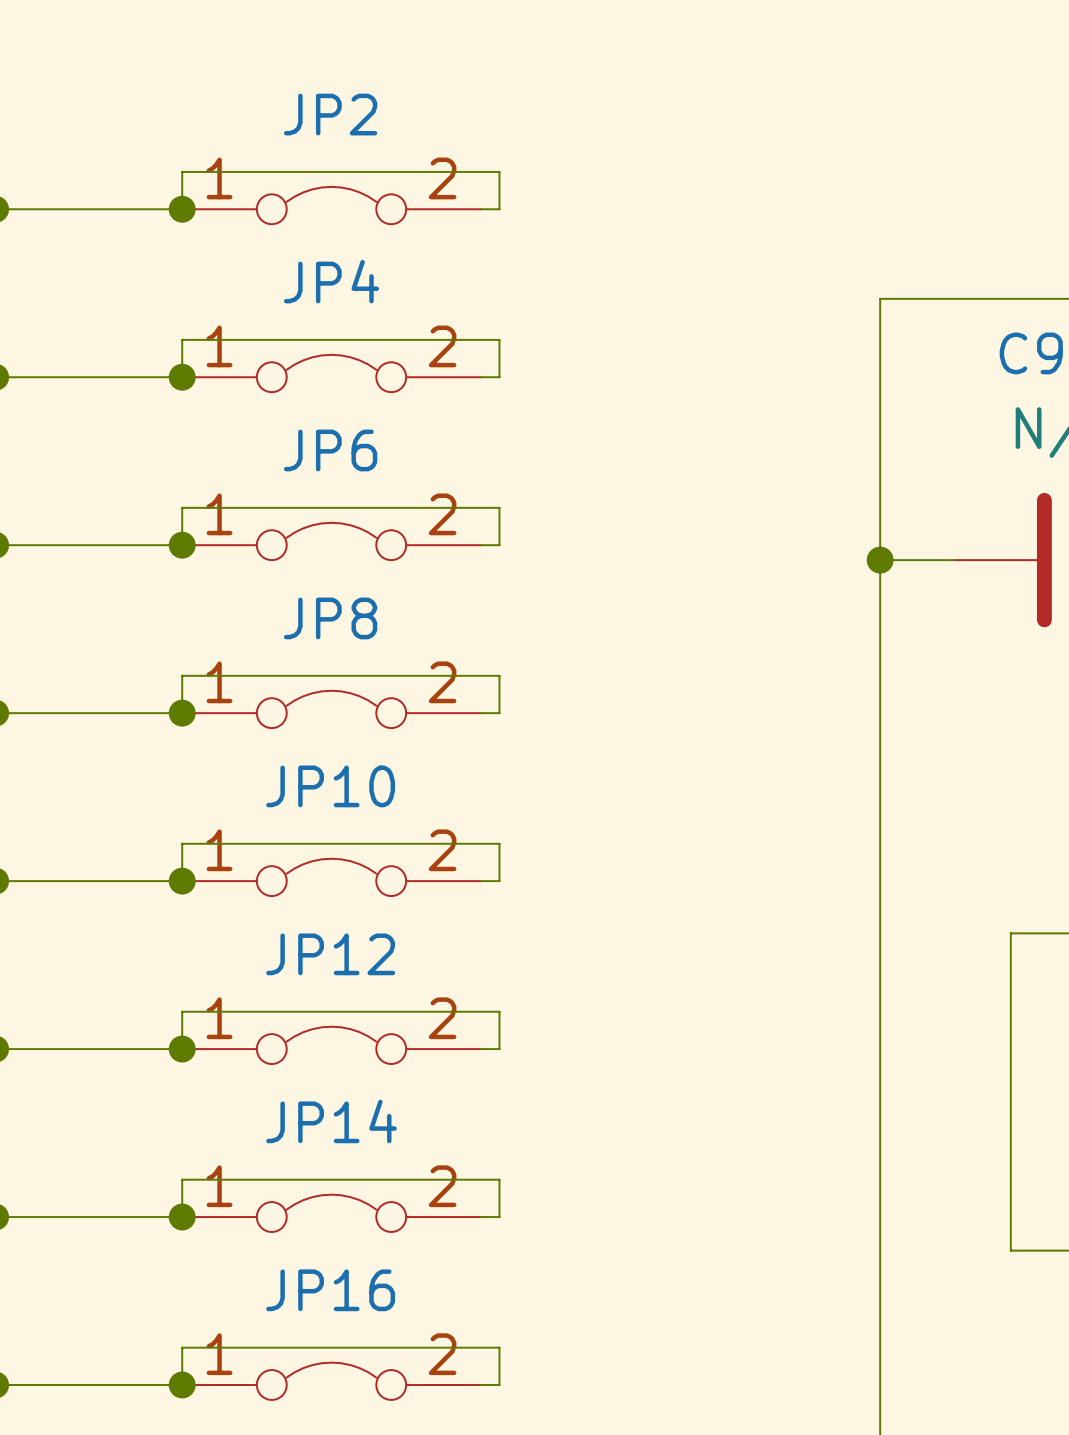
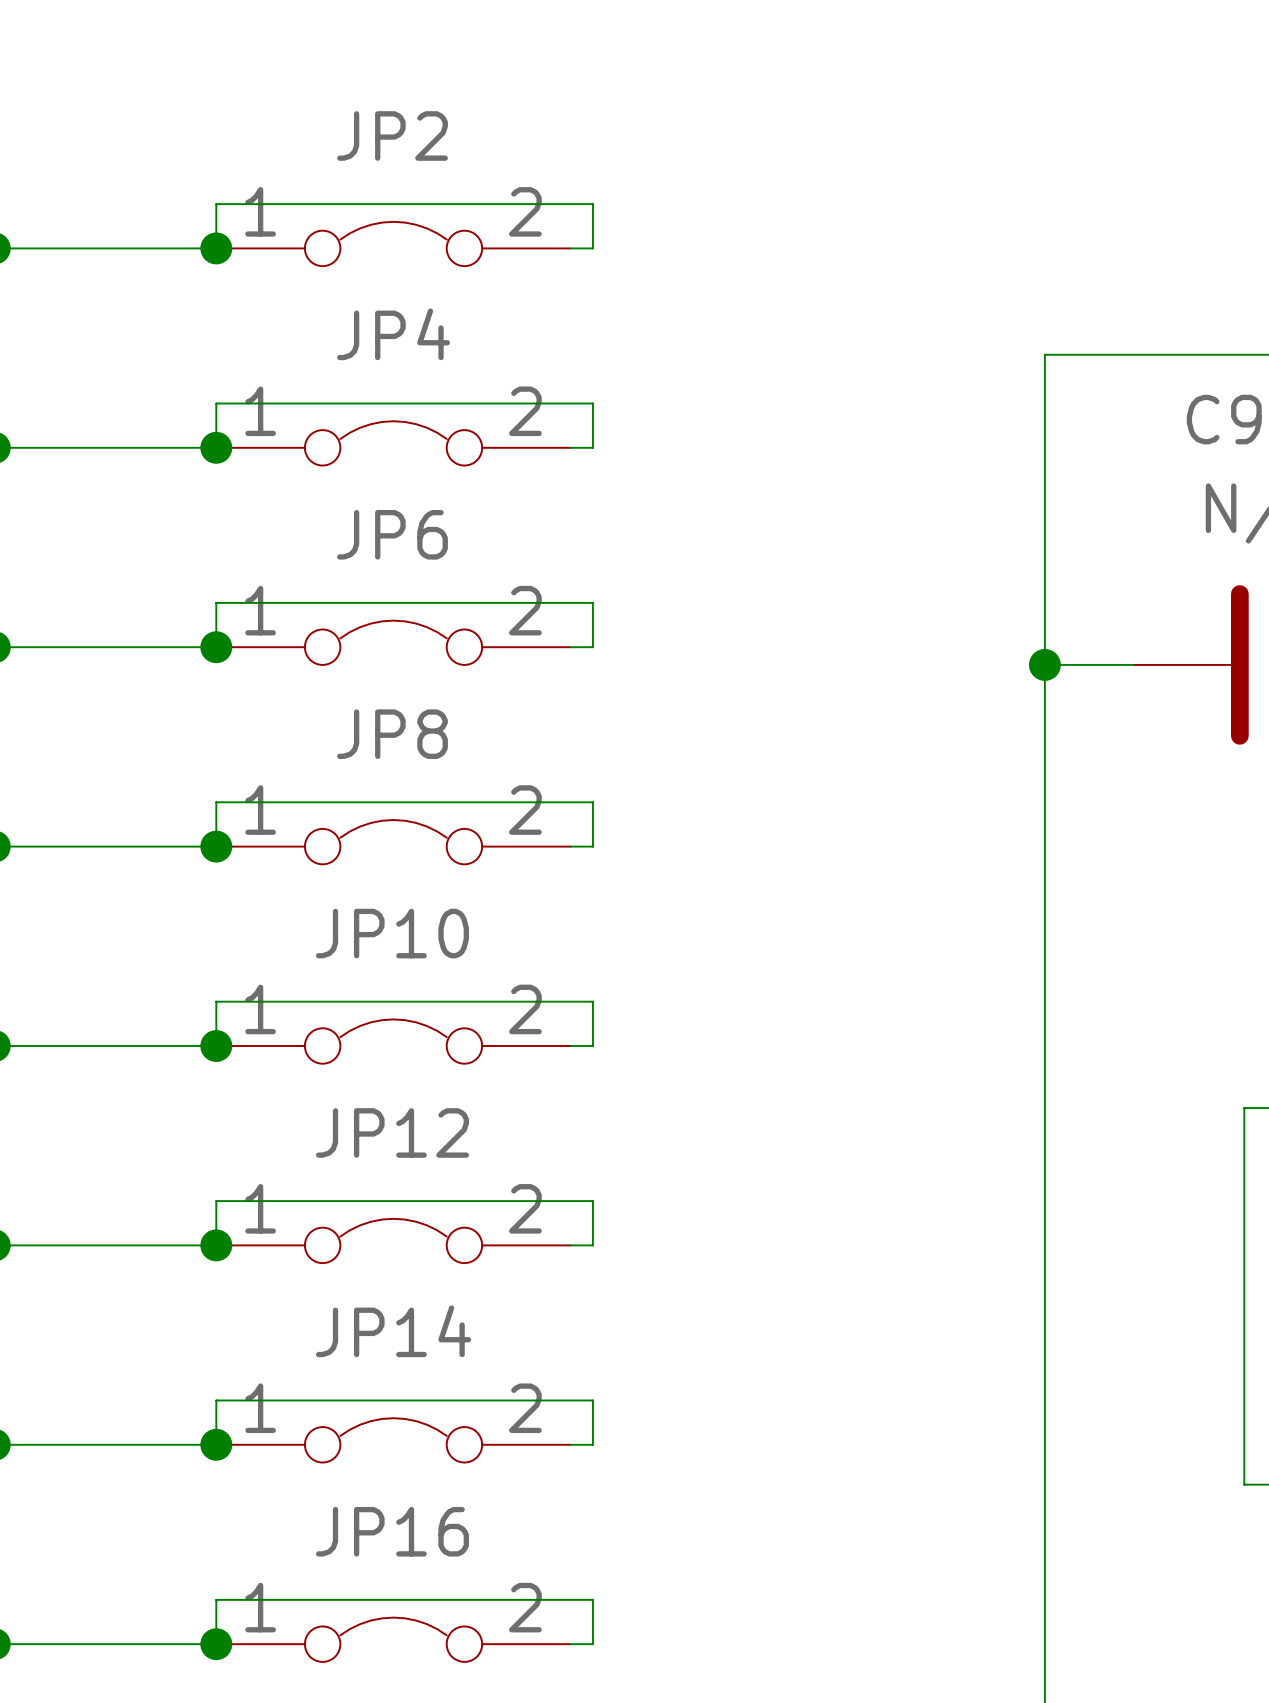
wire: (1048, 933) (1010, 933) (1010, 1250) (1048, 1250) -> (1244, 1108) (1244, 1484)

